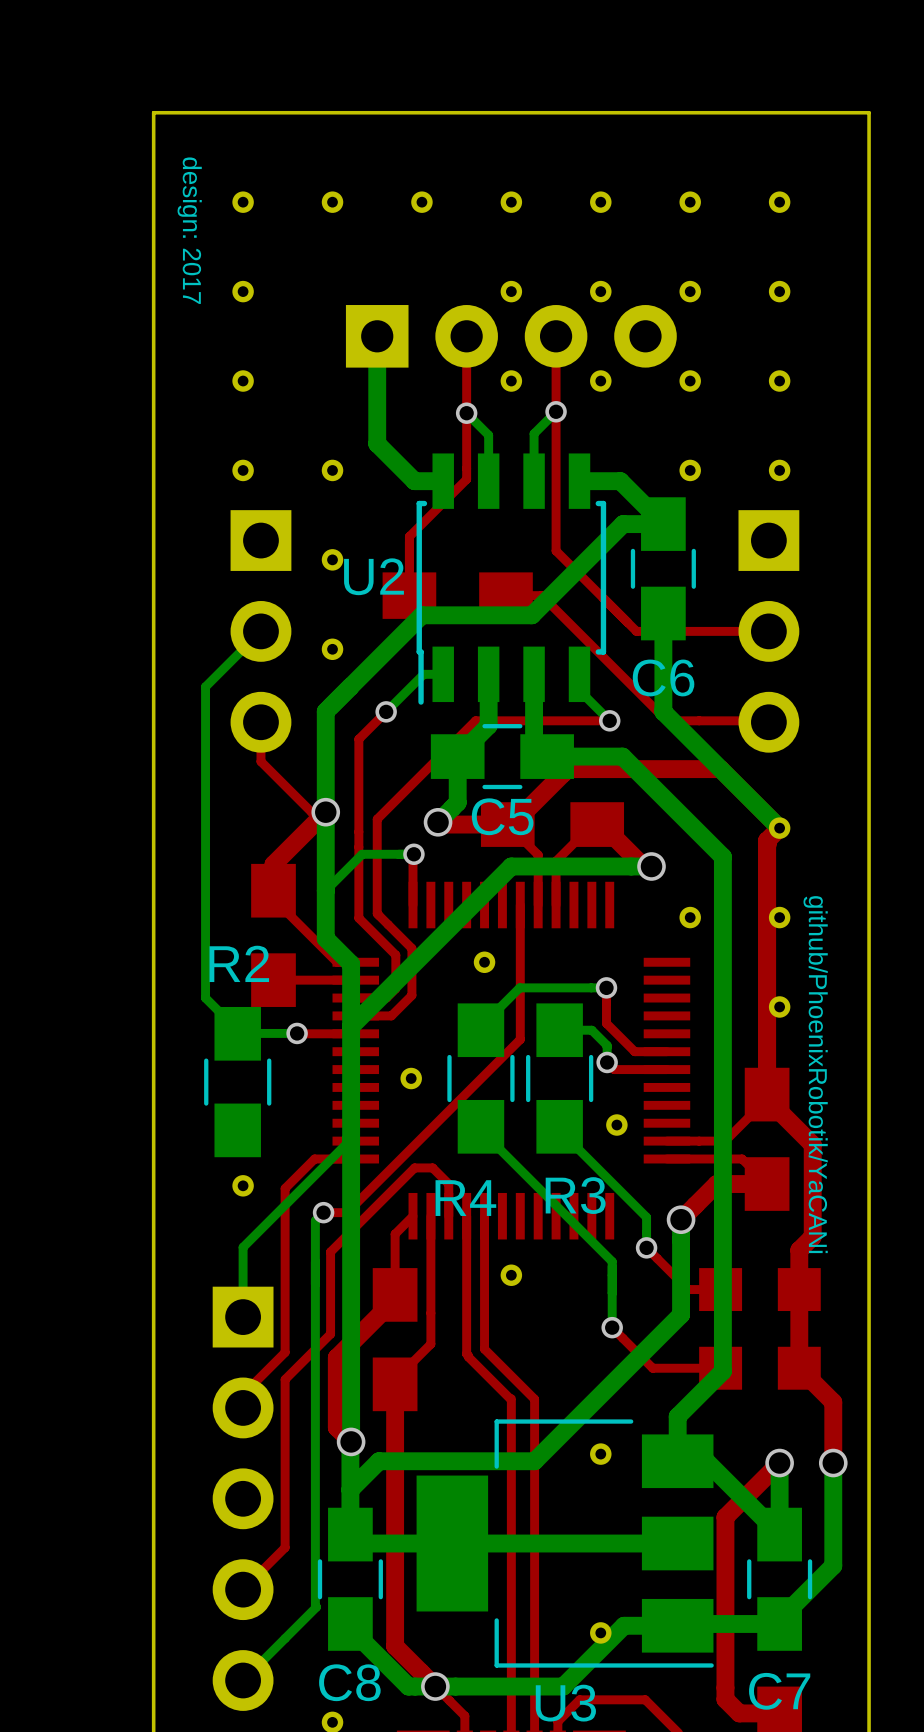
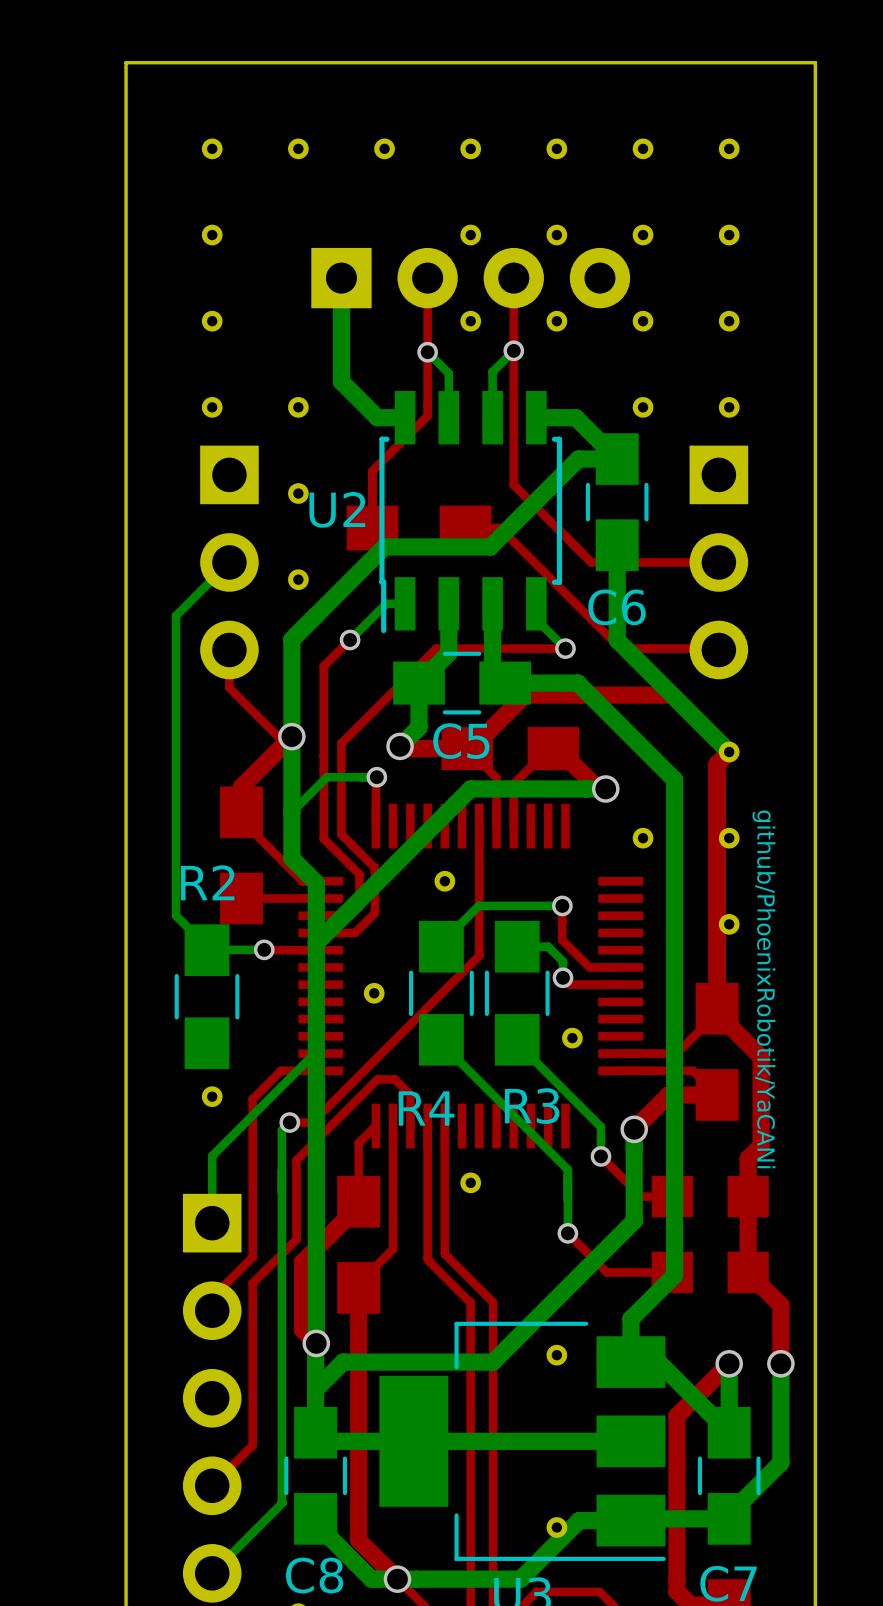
text: design: 2017 (189, 230) -> none

